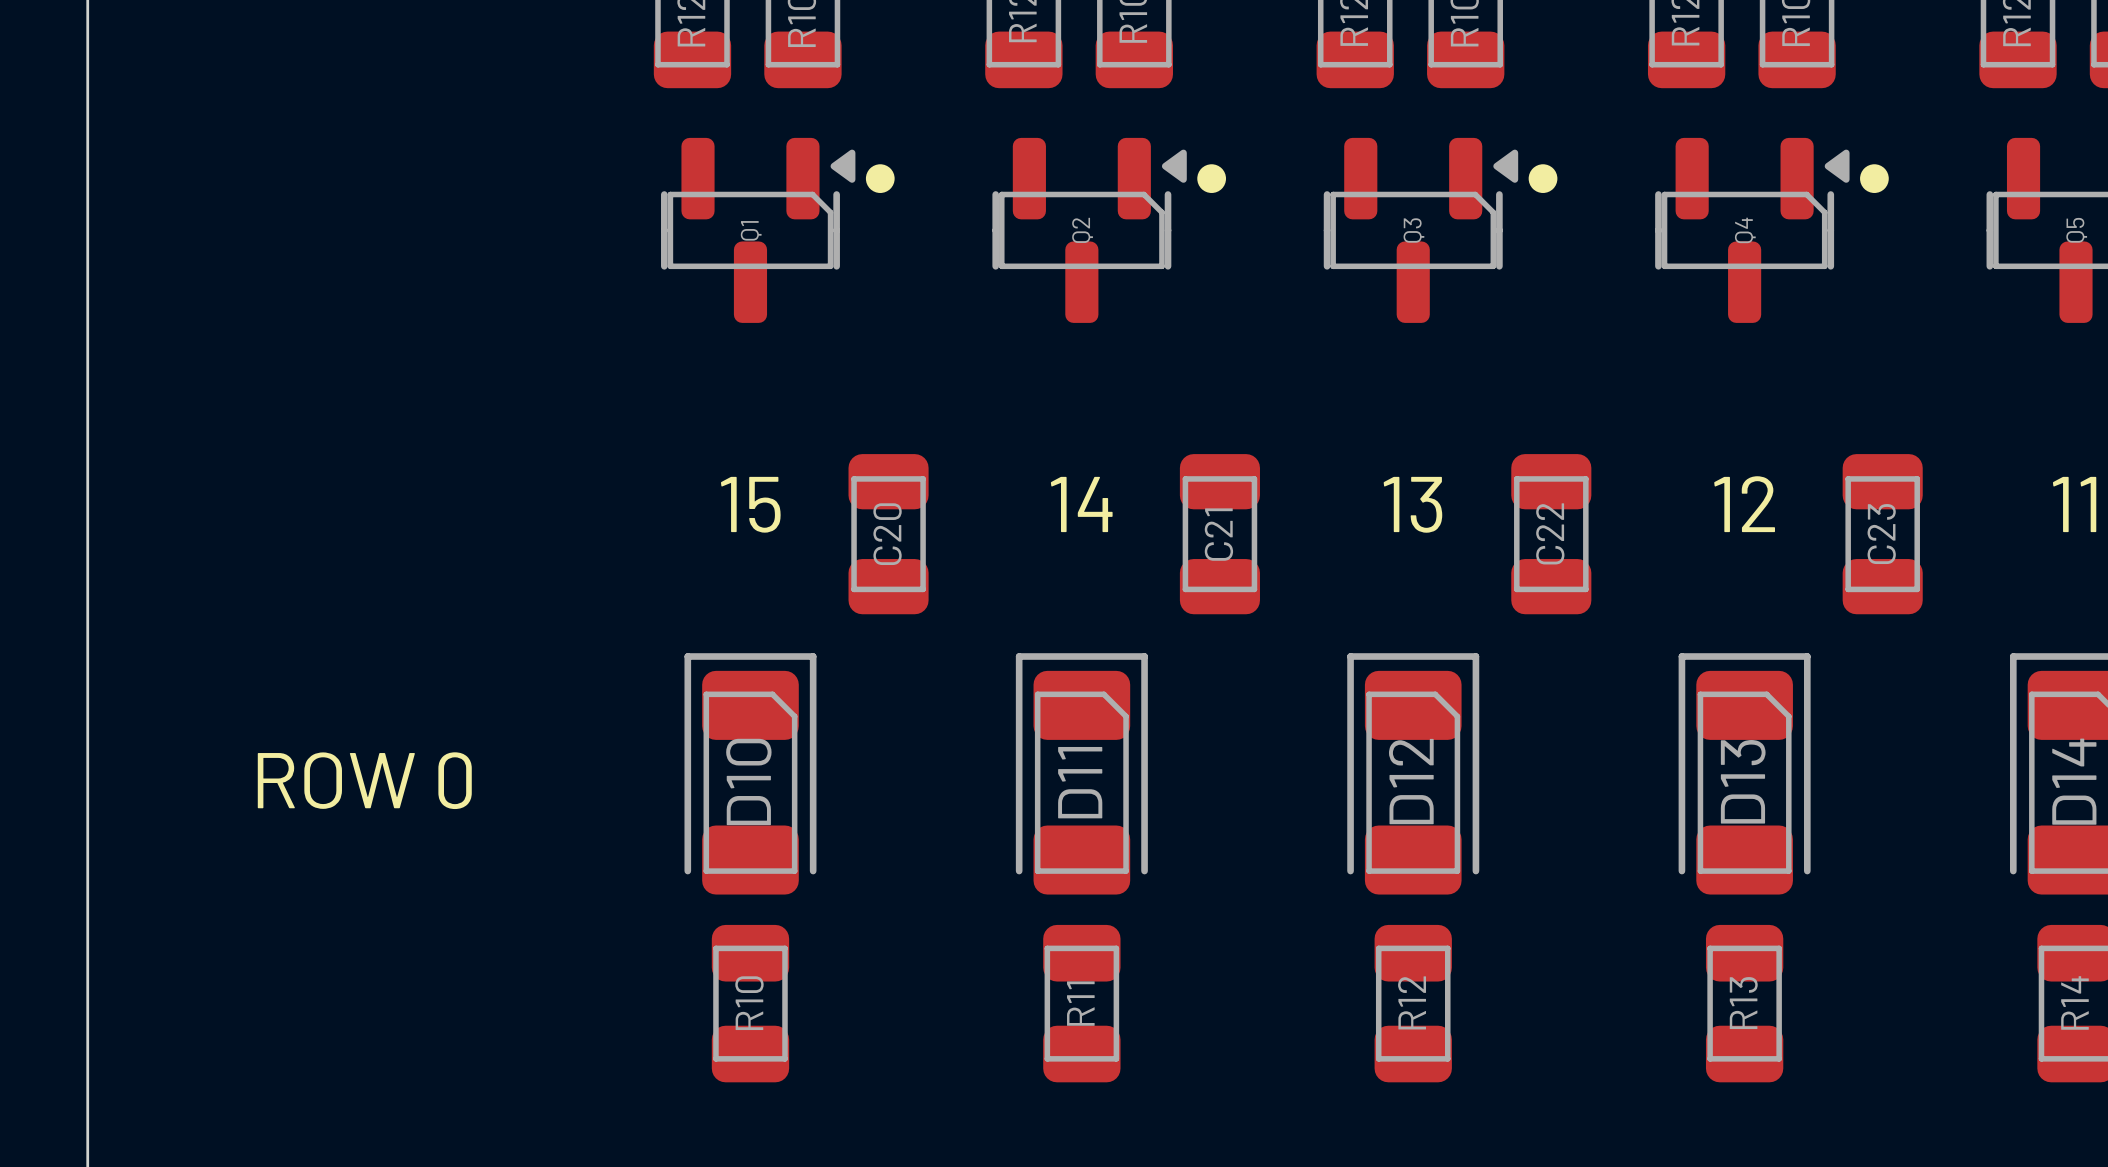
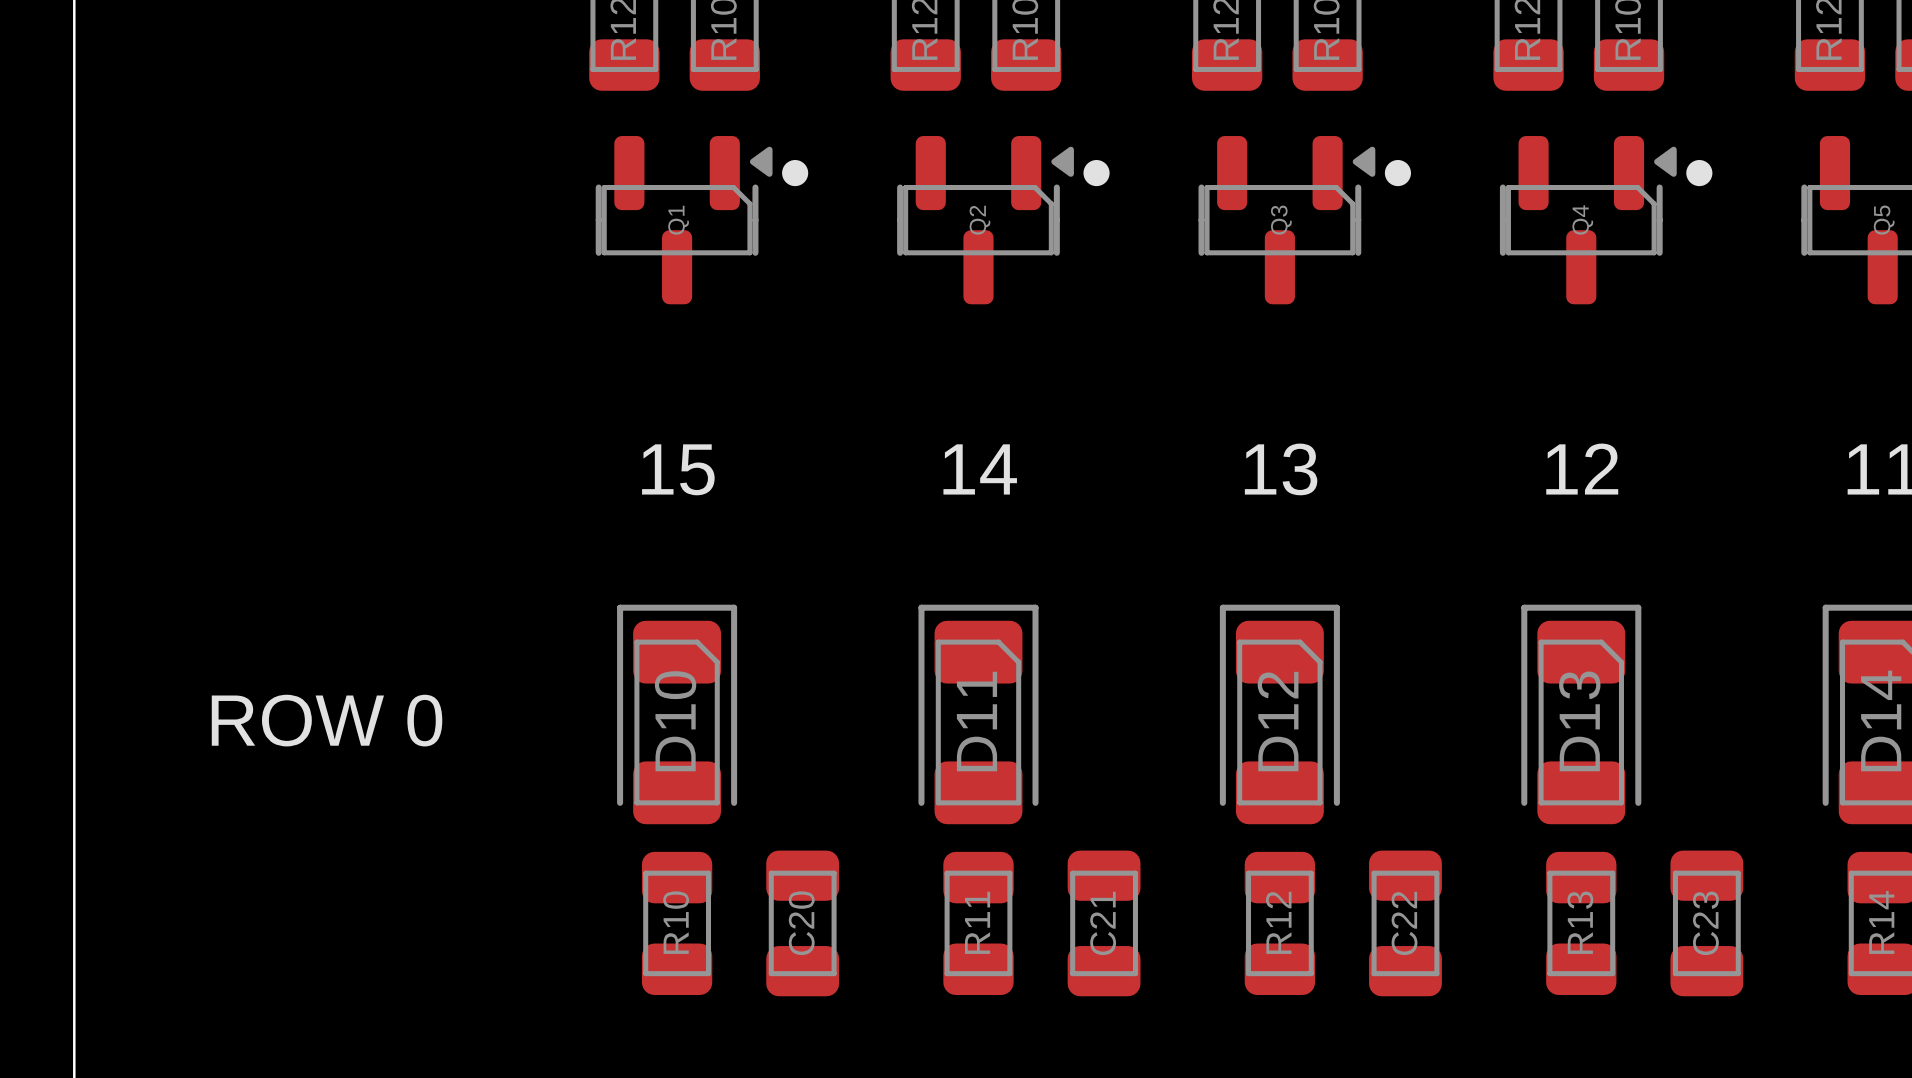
C20 position: (888, 534) -> (802, 923)
C21 position: (1219, 534) -> (1104, 923)
C22 position: (1551, 534) -> (1405, 923)
C23 position: (1882, 534) -> (1706, 923)

